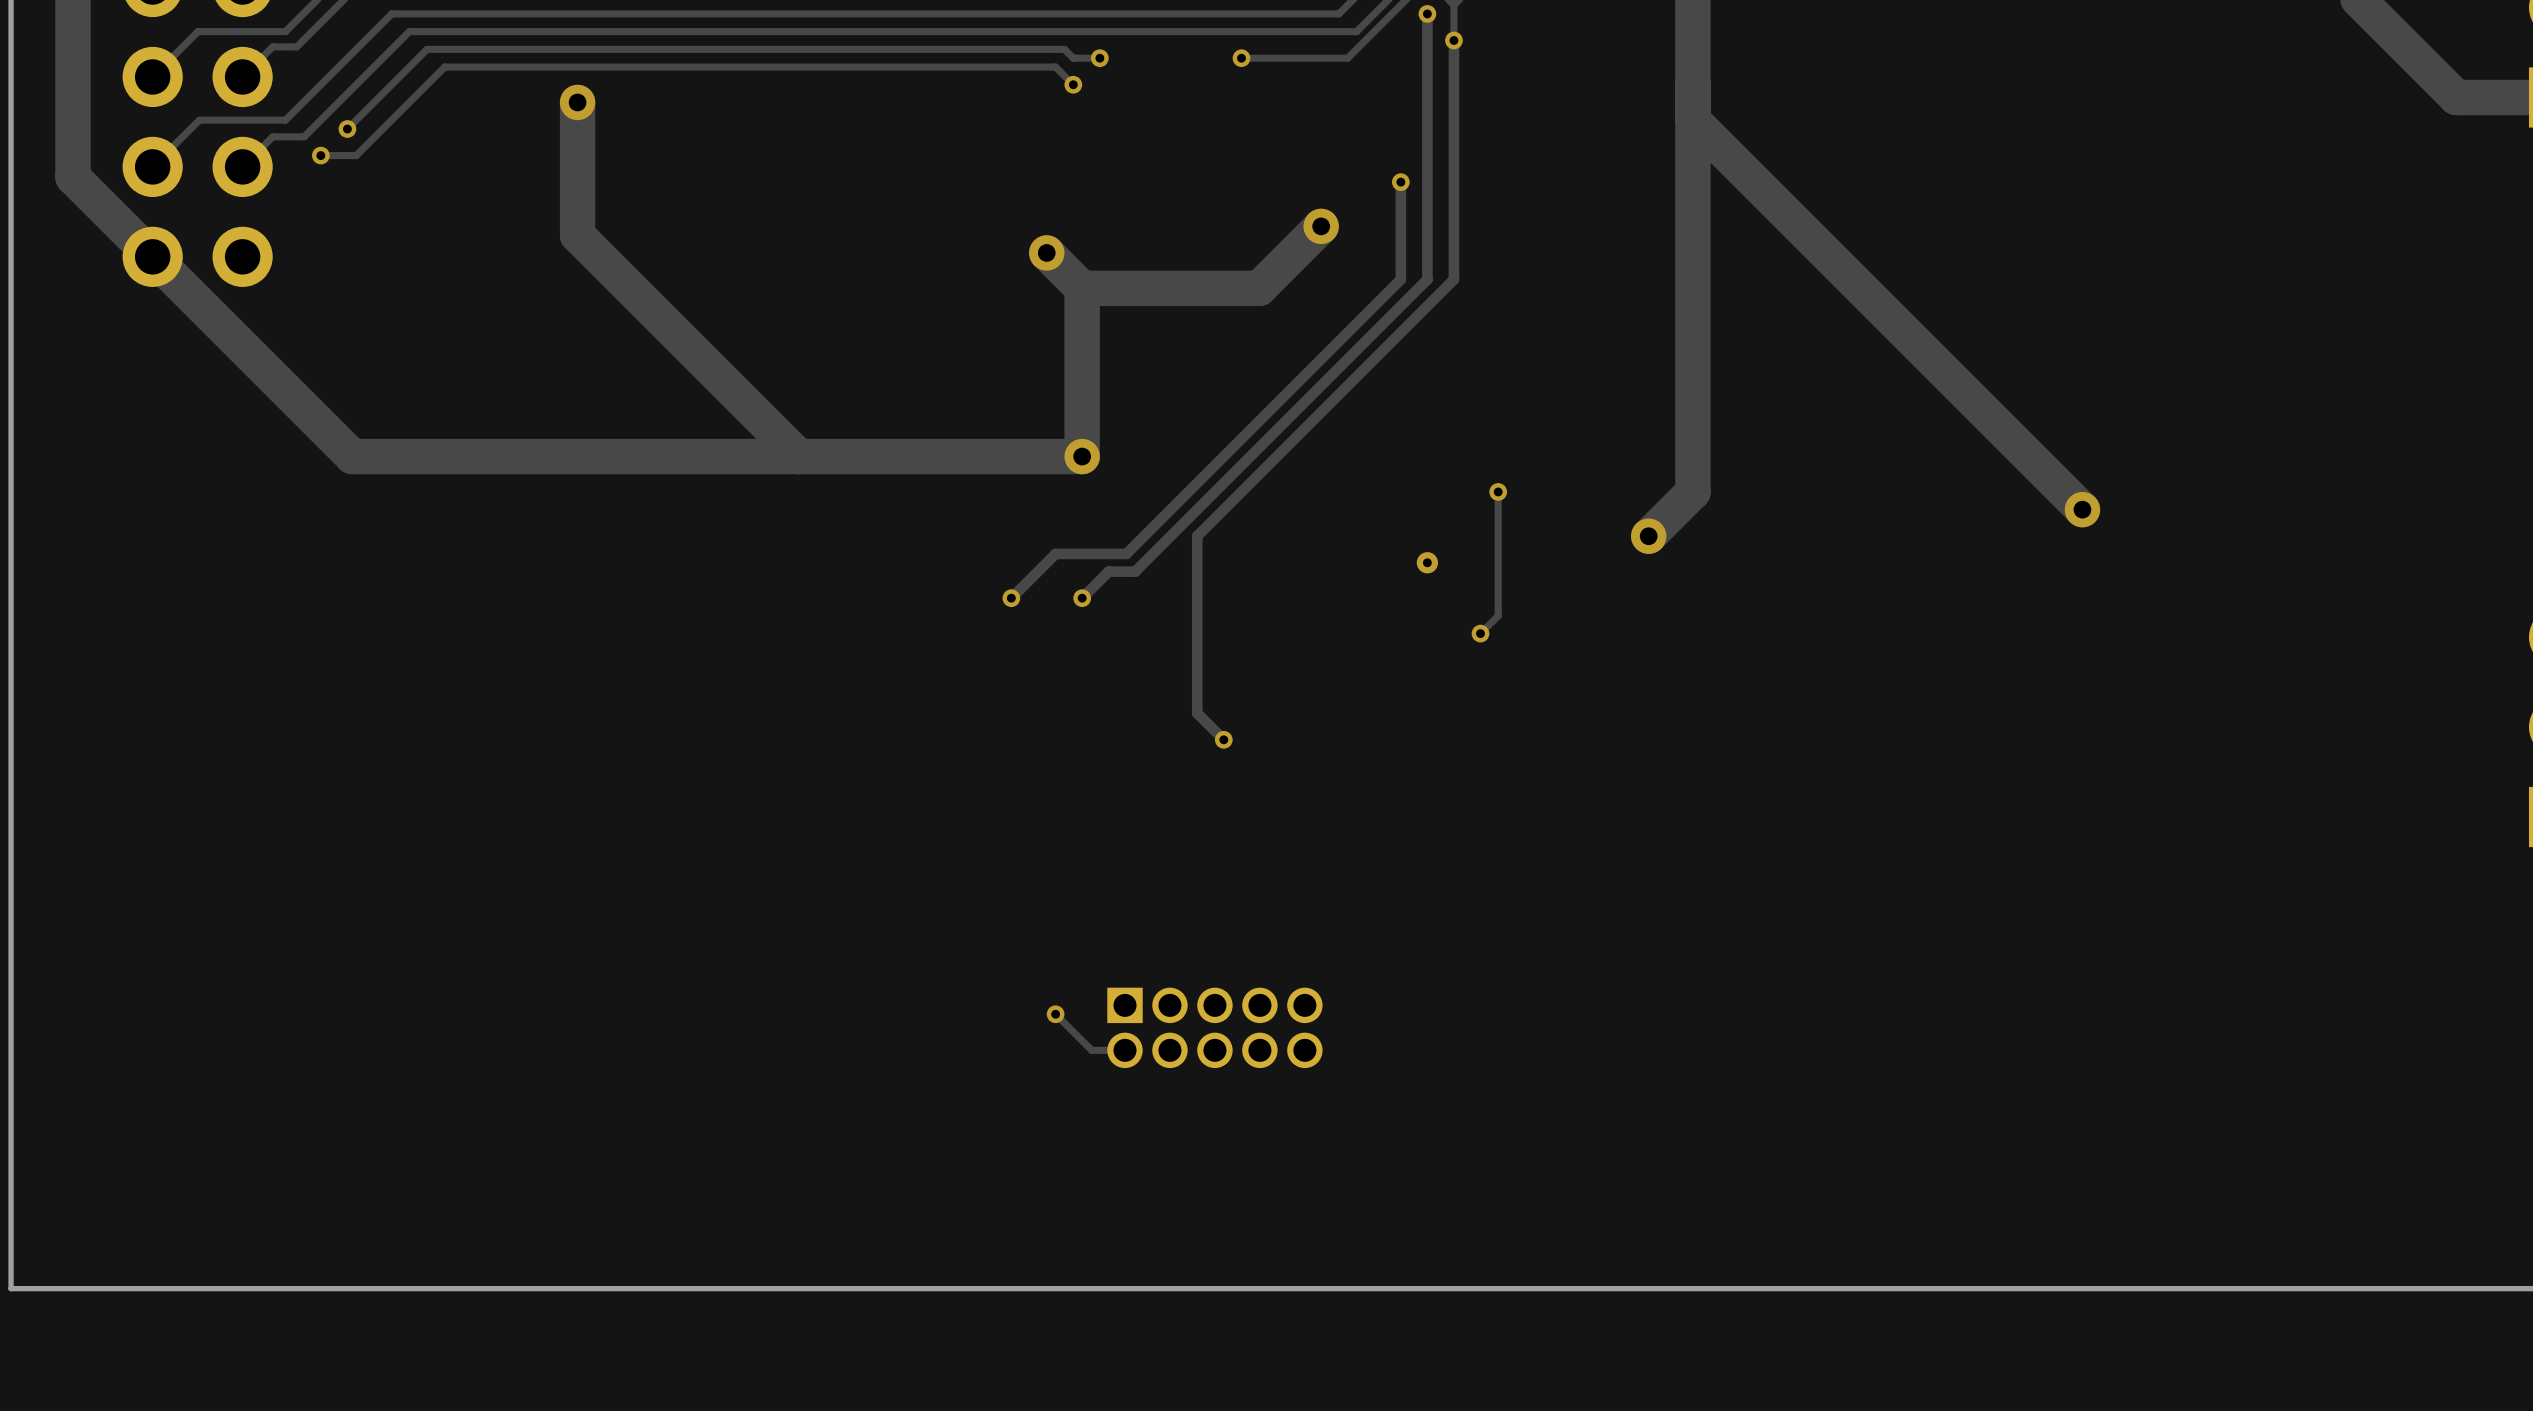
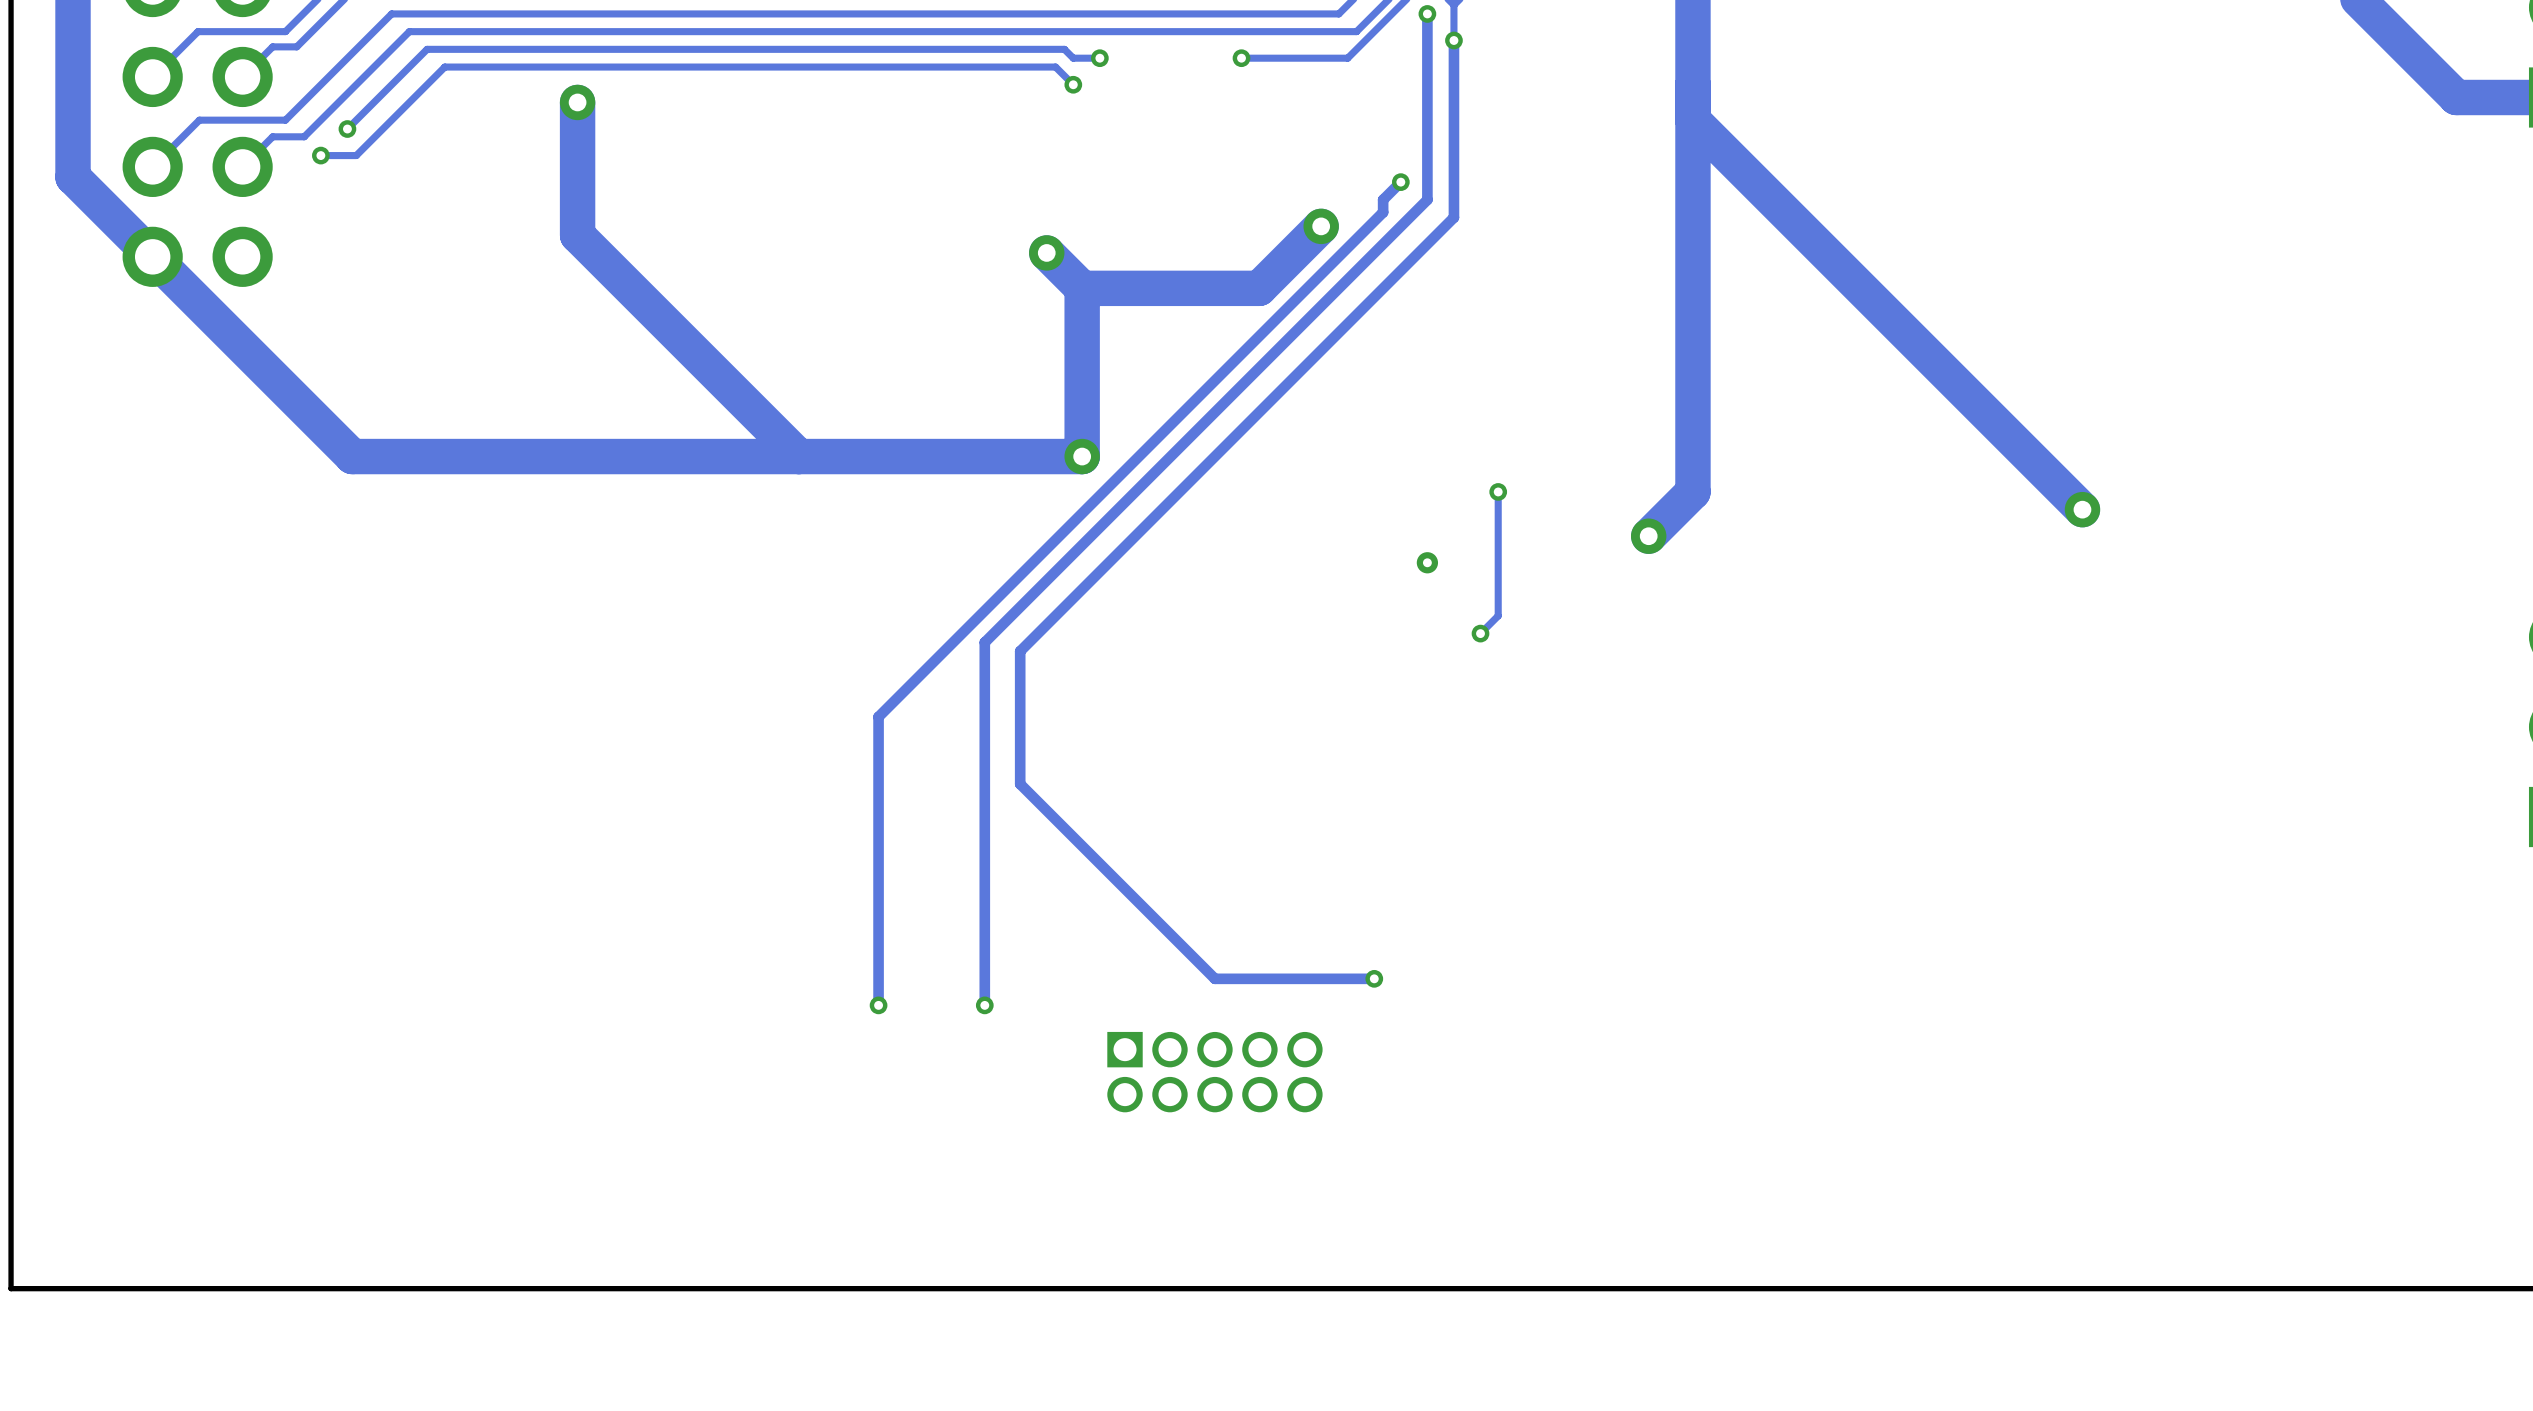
track: (1400, 182) (1400, 279) (1126, 553) (1055, 553) (1011, 598) -> (1400, 182) (1383, 199) (1383, 212) (878, 716) (878, 1005)
track: (1427, 199) (1427, 279) (1135, 571) (1108, 571) (1082, 598) -> (1427, 199) (984, 642) (984, 1005)
track: (1453, 217) (1453, 279) (1197, 536) (1197, 713) (1223, 739) -> (1453, 217) (1020, 651) (1020, 784) (1214, 978) (1374, 978)
via: (1011, 598) -> none
via: (1082, 598) -> none
via: (1223, 739) -> none
via: none -> (1374, 978)
via: none -> (878, 1005)
track: (1055, 1014) (1091, 1050) (1125, 1050) -> none
via position: (1055, 1014) -> (984, 1005)
part position: (1214, 1027) -> (1214, 1072)

